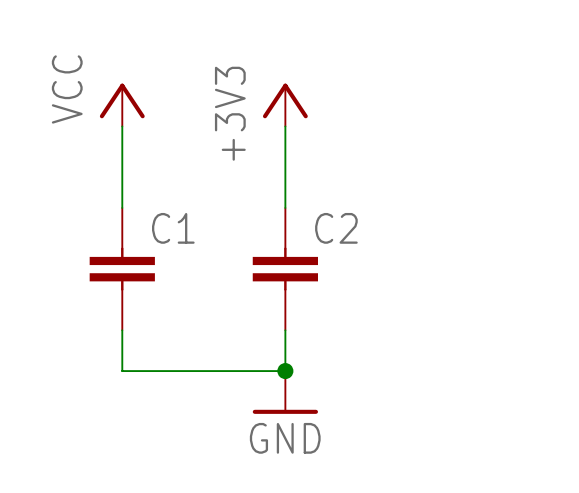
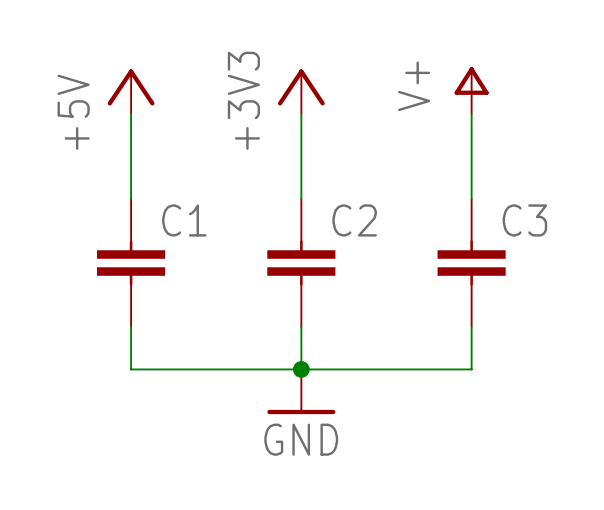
power symbol: none -> V+ (471, 90)
power symbol: VCC (122, 105) -> +5V (131, 91)
wire: none -> (471, 114) (471, 199)
C3: none -> (471, 263)
wire: none -> (471, 326) (471, 369) (301, 369)

